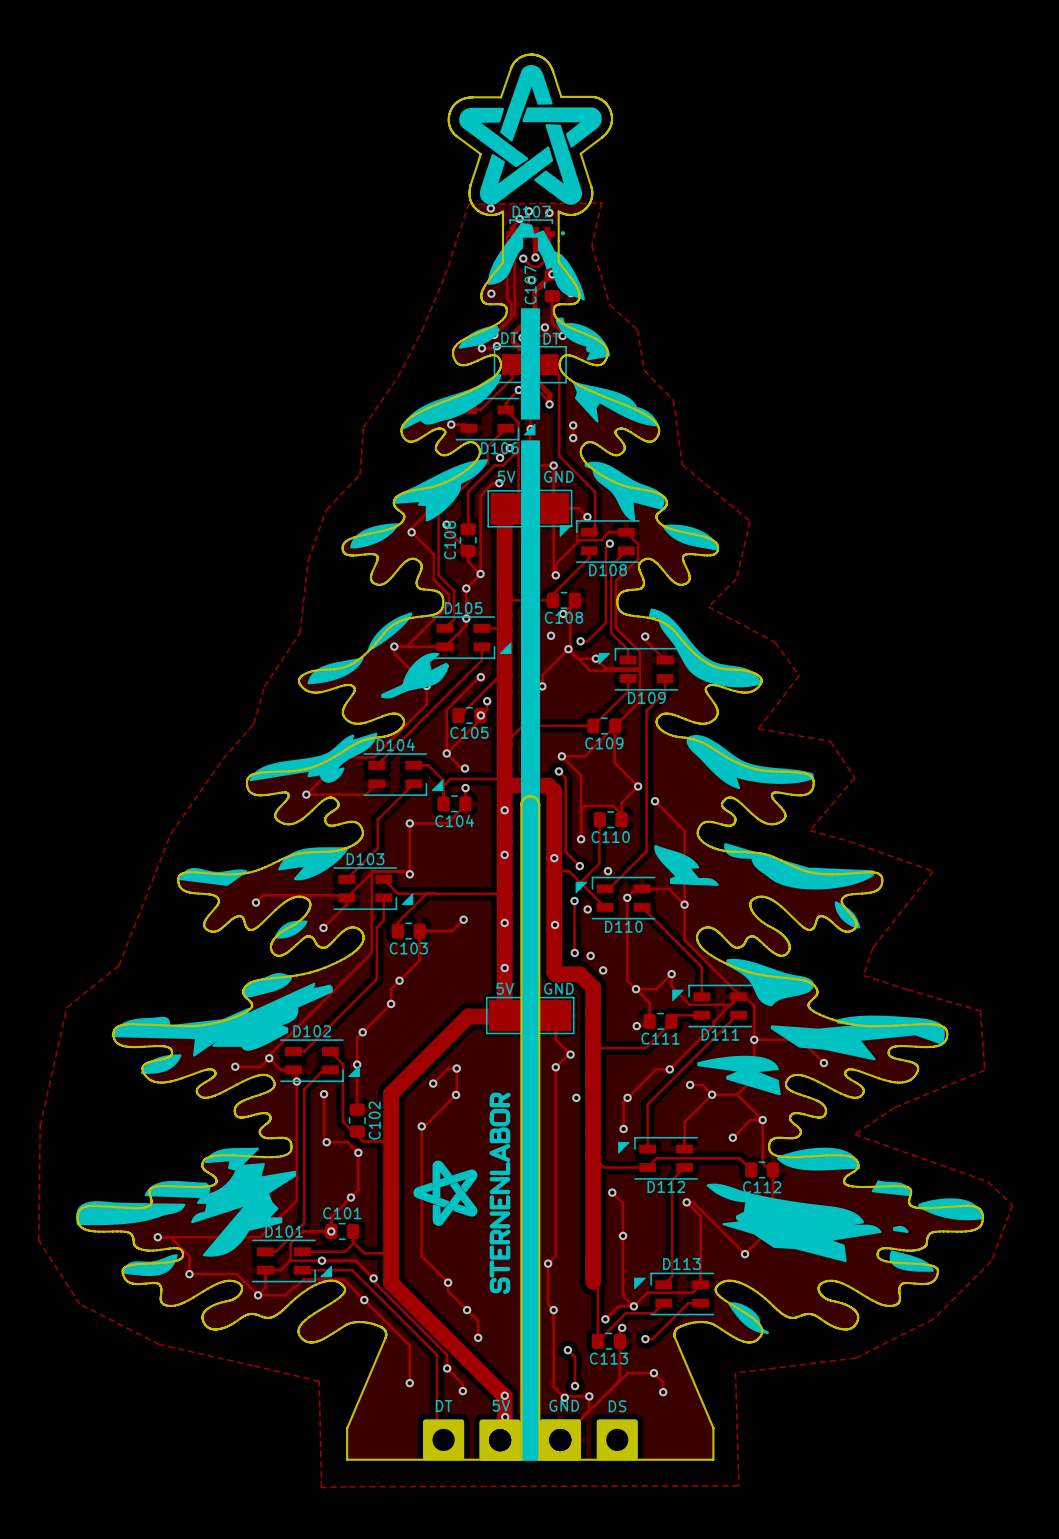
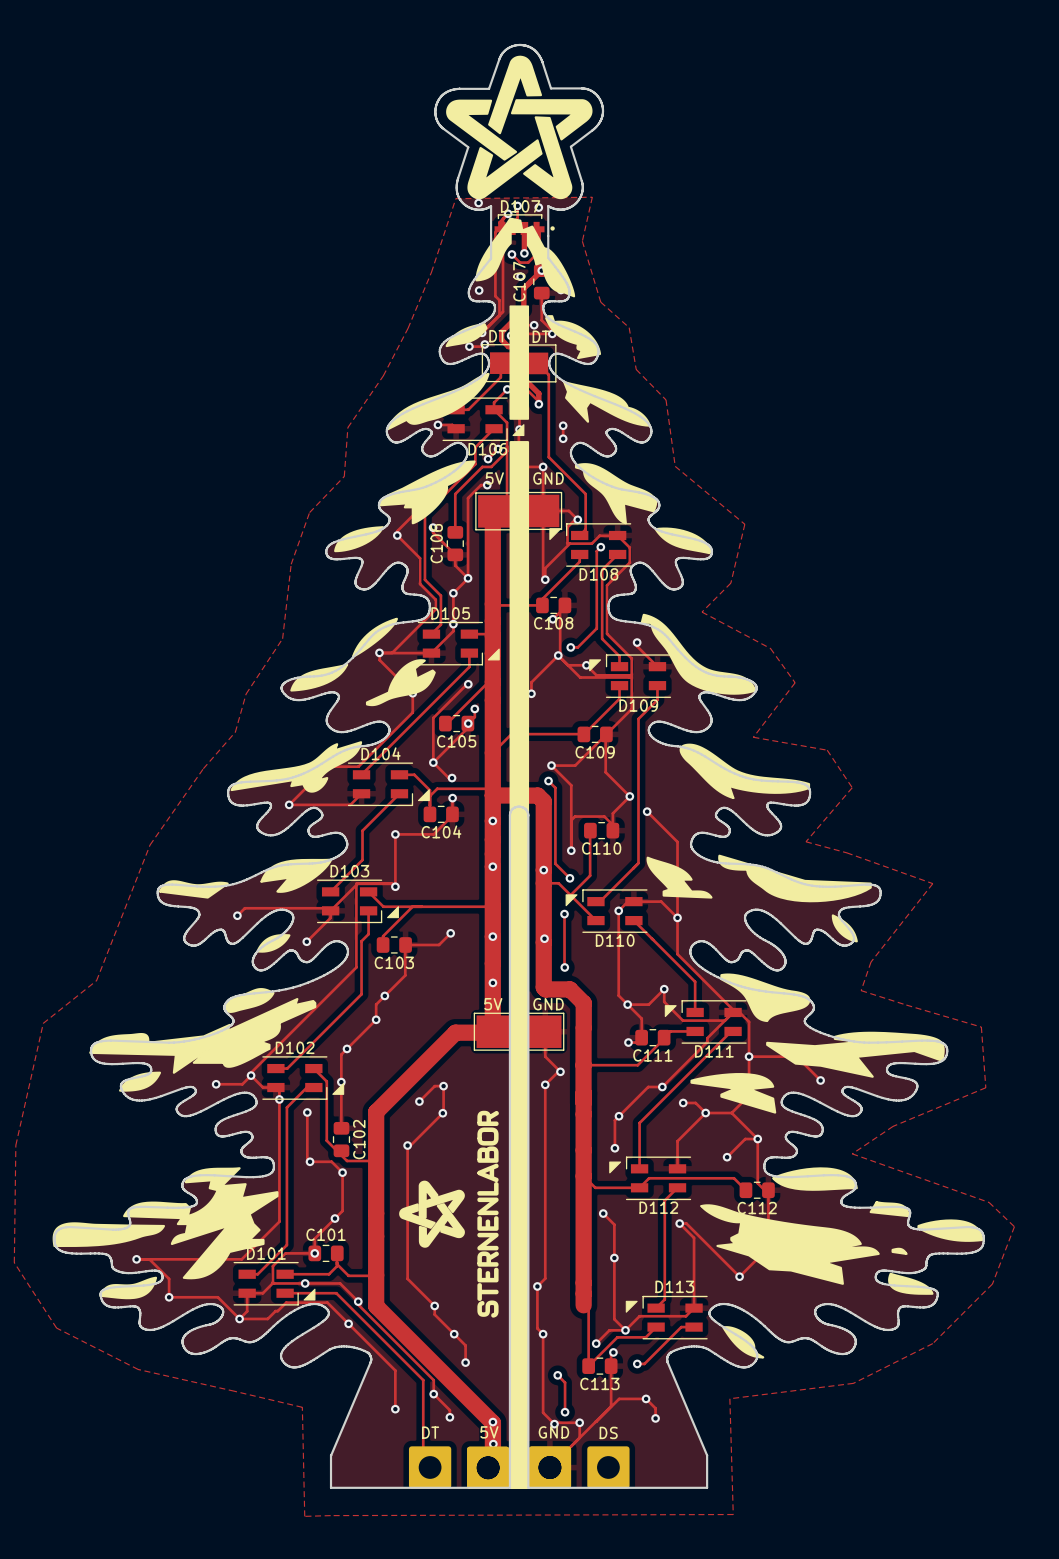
via: (551, 635) -> none
via: (608, 871) -> none
via: (587, 909) -> none
via: (590, 955) -> none
via: (603, 970) -> none
via: (576, 1097) -> none

